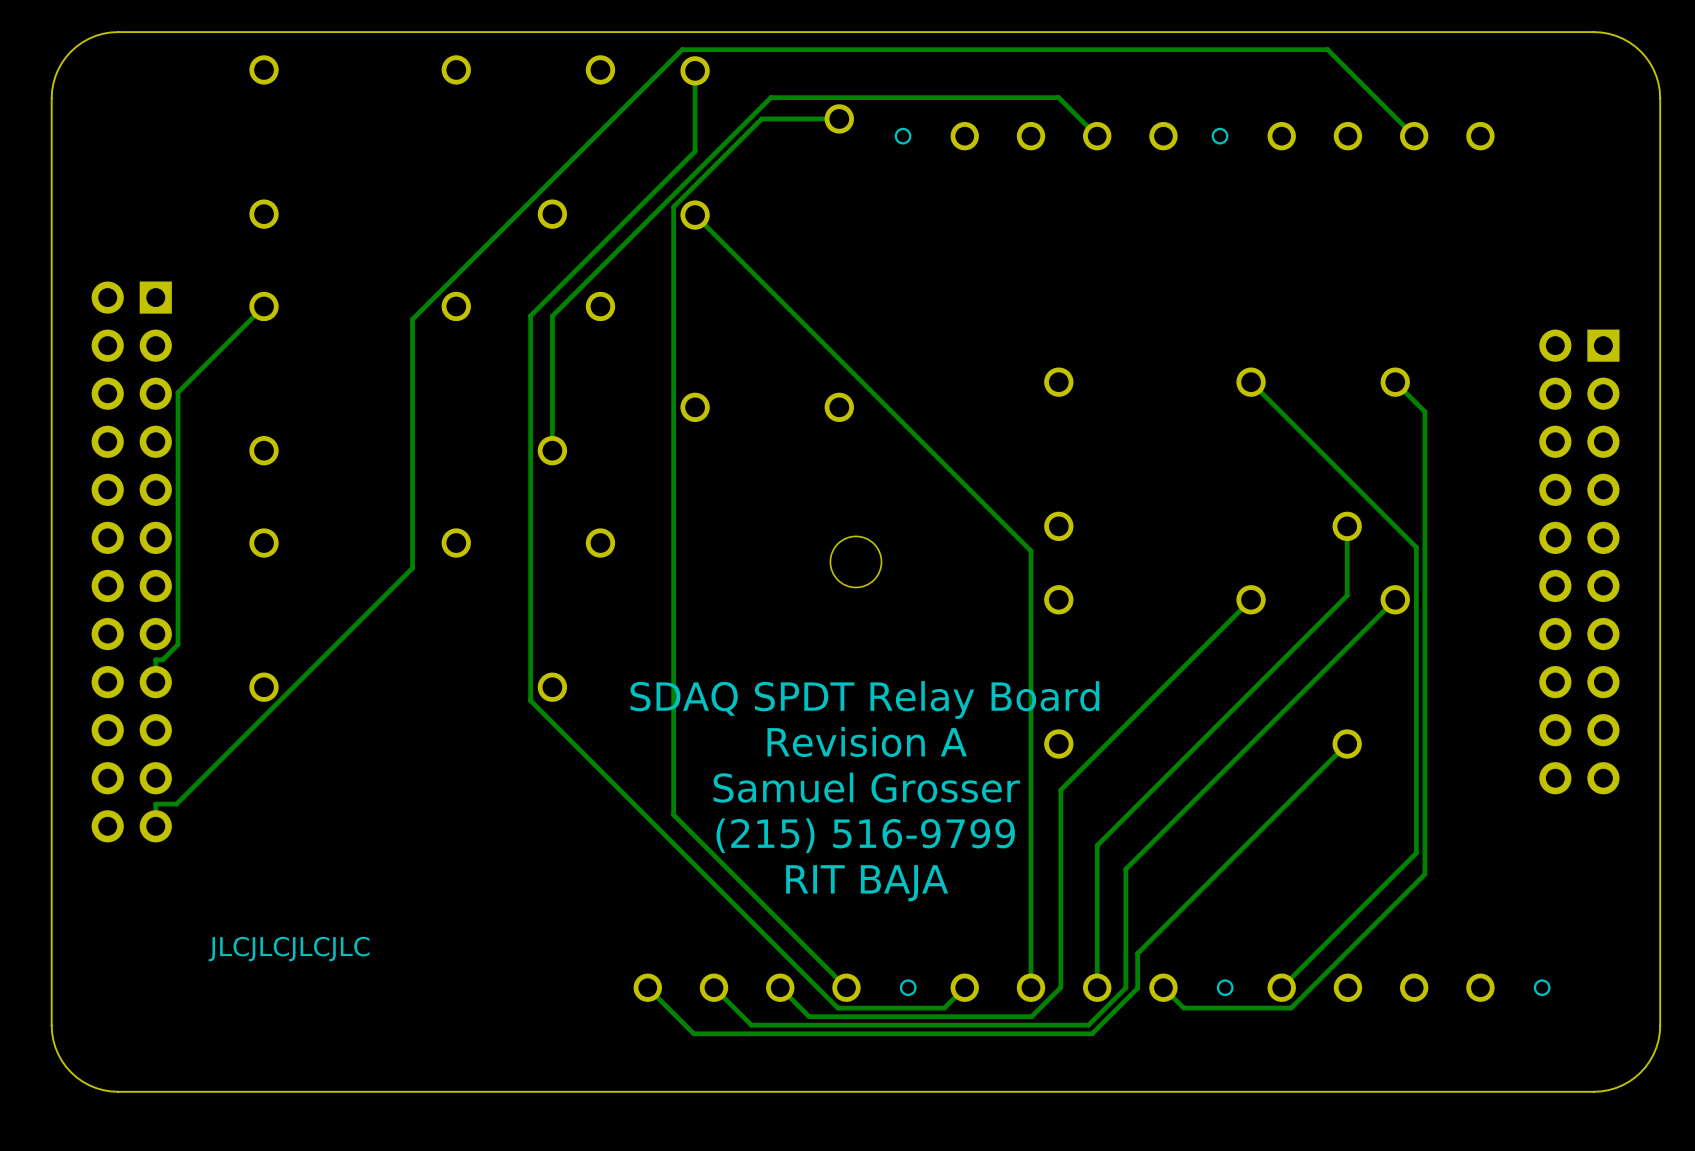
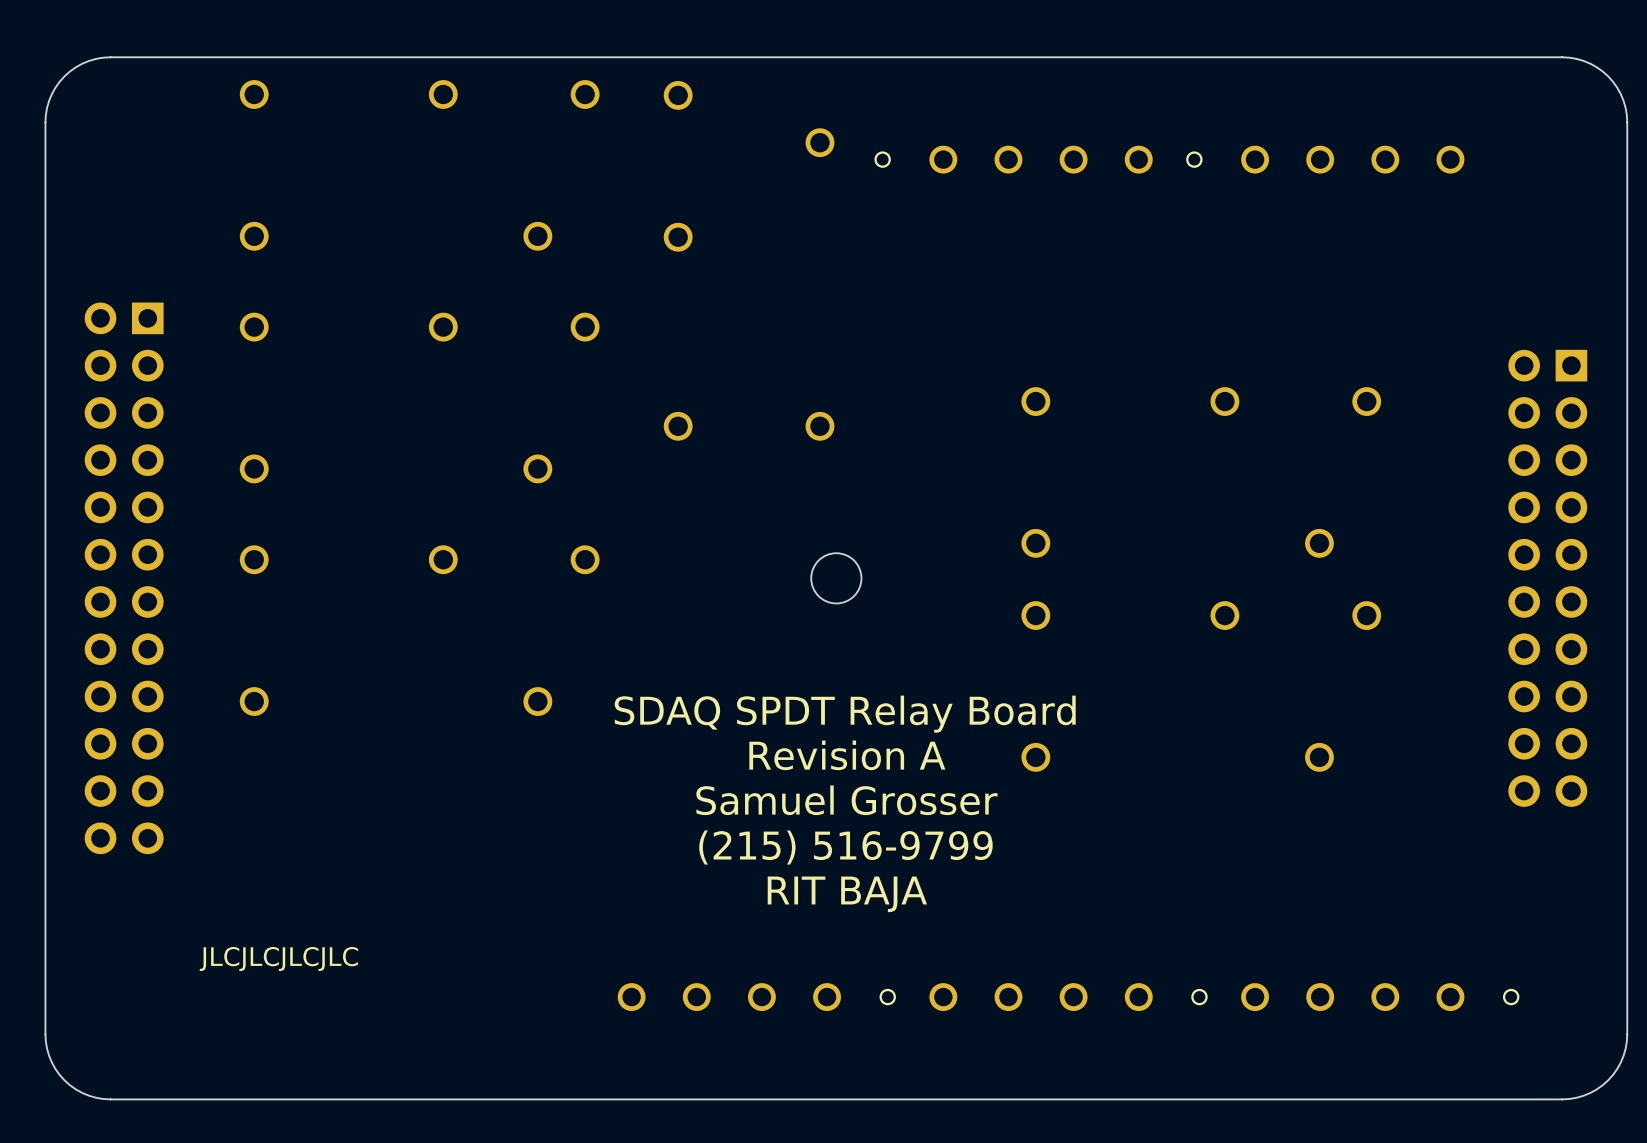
track: (695, 70) (695, 151) (530, 315) (530, 700) (838, 1008) (944, 1008) (964, 987) -> none
track: (839, 118) (761, 118) (673, 206) (673, 814) (846, 987) -> none
track: (1097, 136) (1058, 97) (770, 97) (552, 316) (552, 450) -> none
track: (1414, 136) (1327, 49) (682, 49) (412, 319) (412, 568) (176, 804) (155, 804) (155, 826) -> none
track: (695, 215) (1030, 550) (1030, 987) -> none
track: (264, 306) (178, 392) (178, 644) (162, 659) (155, 659) (155, 682) -> none
track: (1251, 382) (1416, 547) (1416, 853) (1281, 987) -> none
track: (1395, 382) (1424, 411) (1424, 874) (1291, 1008) (1183, 1008) (1163, 987) -> none
track: (1347, 526) (1347, 595) (1097, 845) (1097, 987) -> none
track: (1251, 599) (1060, 790) (1060, 987) (1031, 1016) (809, 1016) (780, 987) -> none
track: (1395, 599) (1125, 869) (1125, 987) (1088, 1025) (751, 1025) (714, 987) -> none
track: (1347, 743) (1137, 953) (1137, 988) (1092, 1033) (693, 1033) (647, 987) -> none

